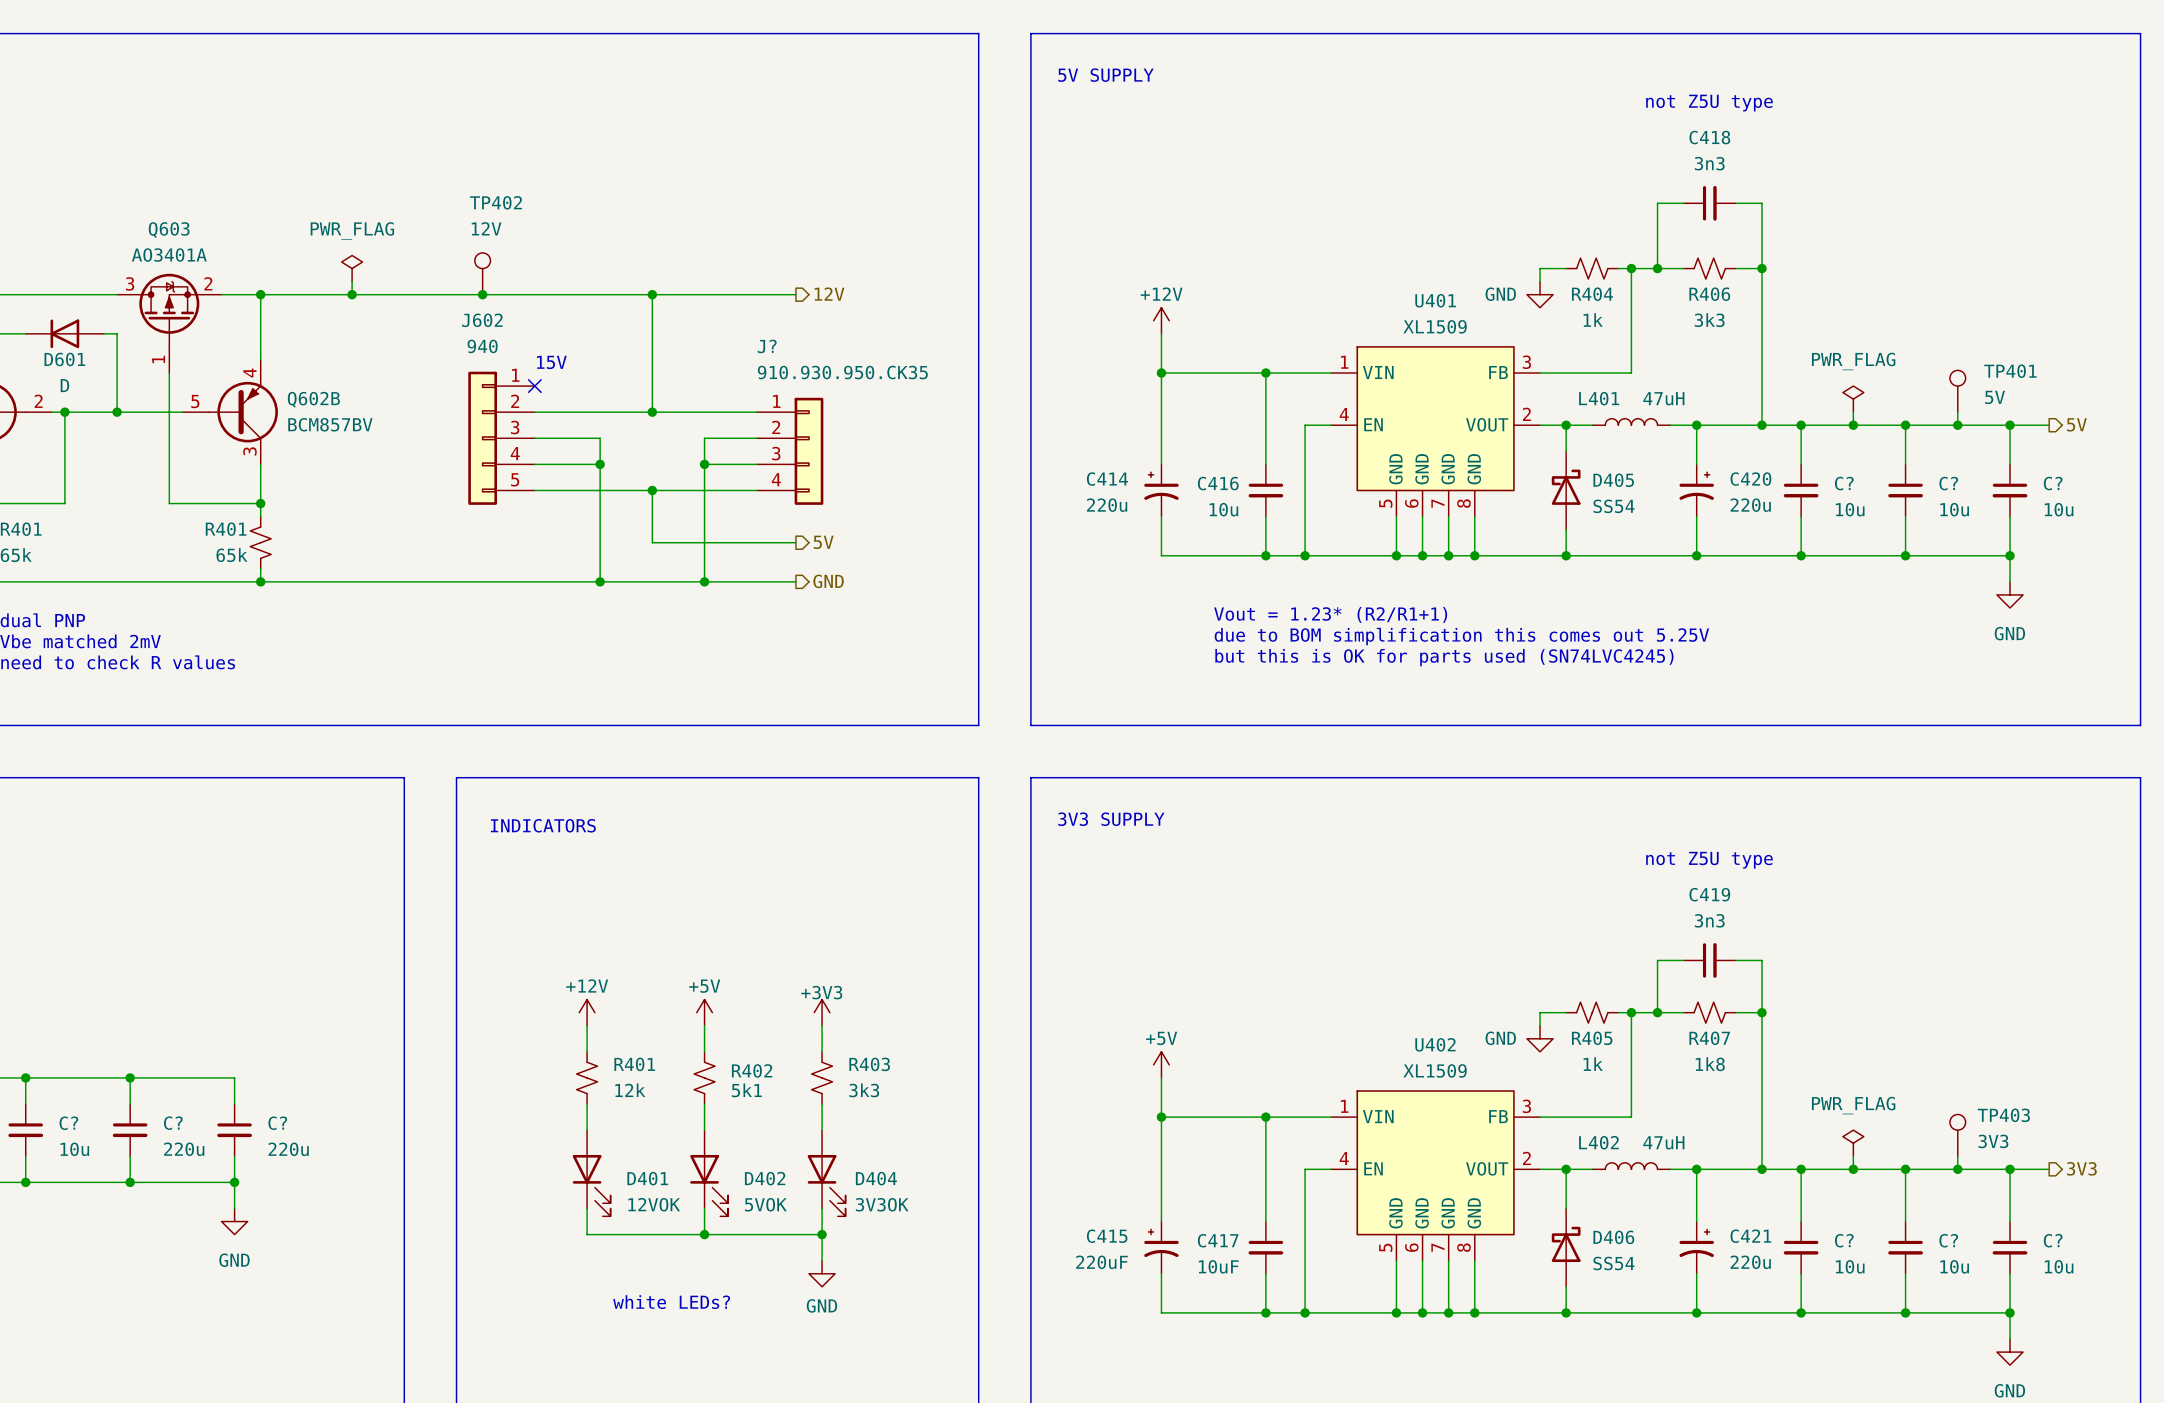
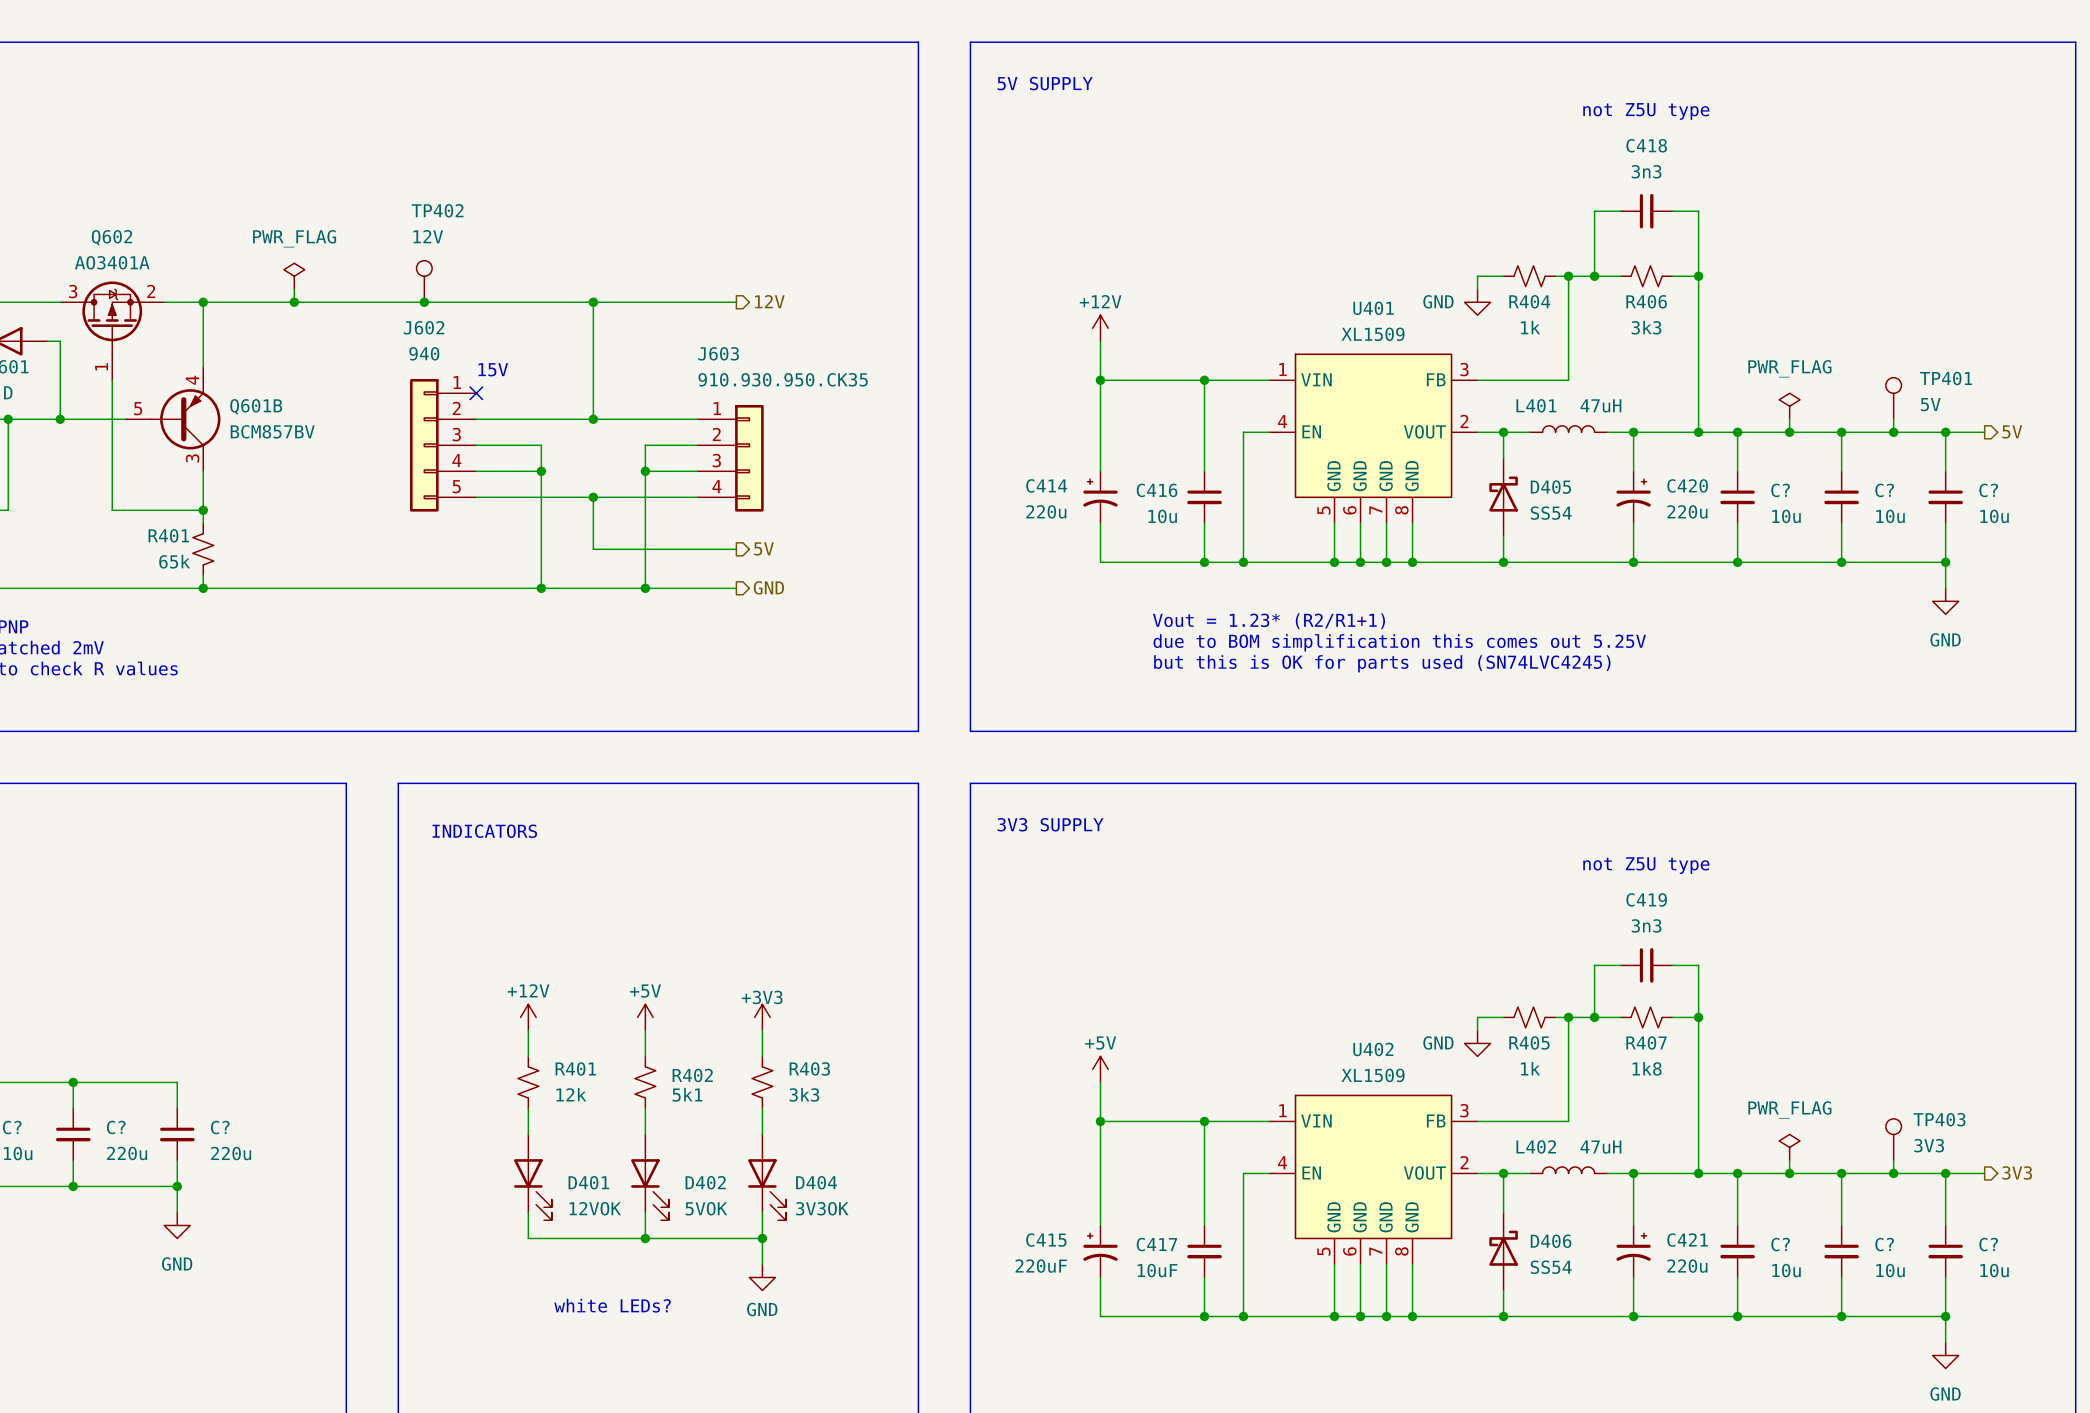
Q603 name: Q603 (169, 229) -> Q602 (112, 237)
J? name: J? (767, 346) -> J603 (718, 353)
Q602B name: Q602B (313, 399) -> Q601B (256, 406)

